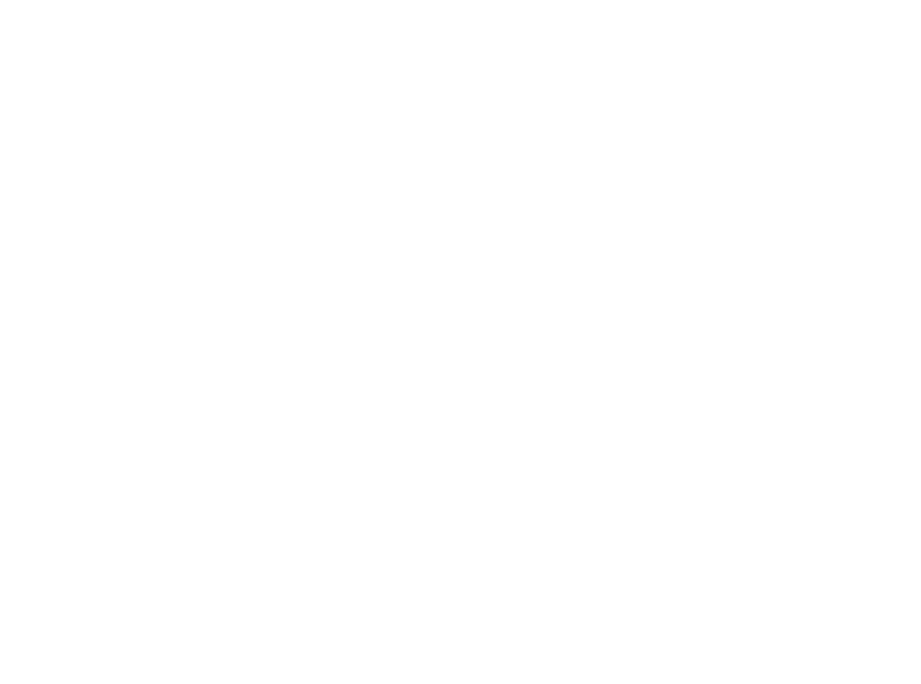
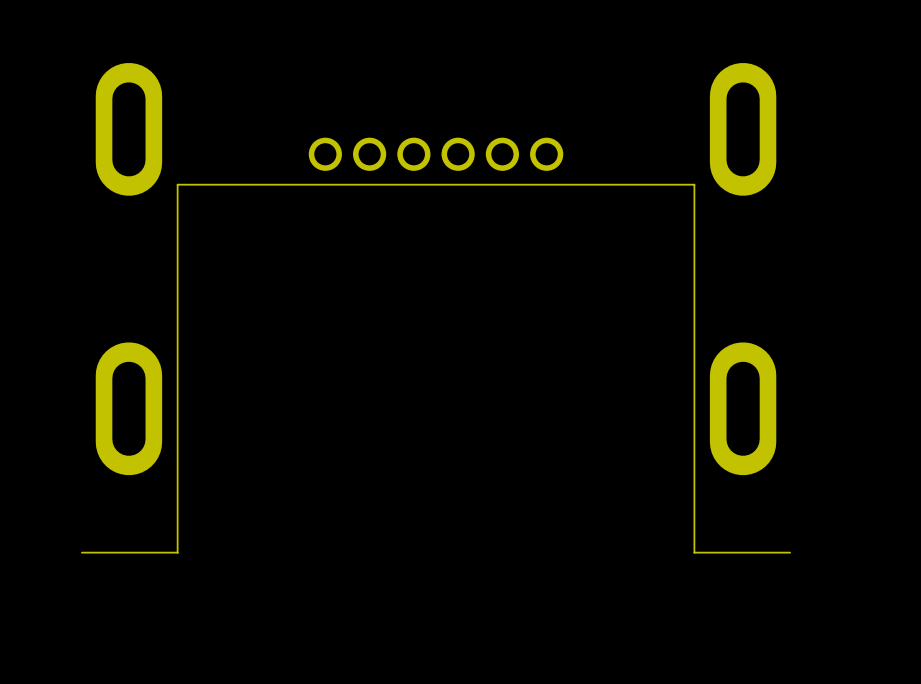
part: none -> (436, 307)

